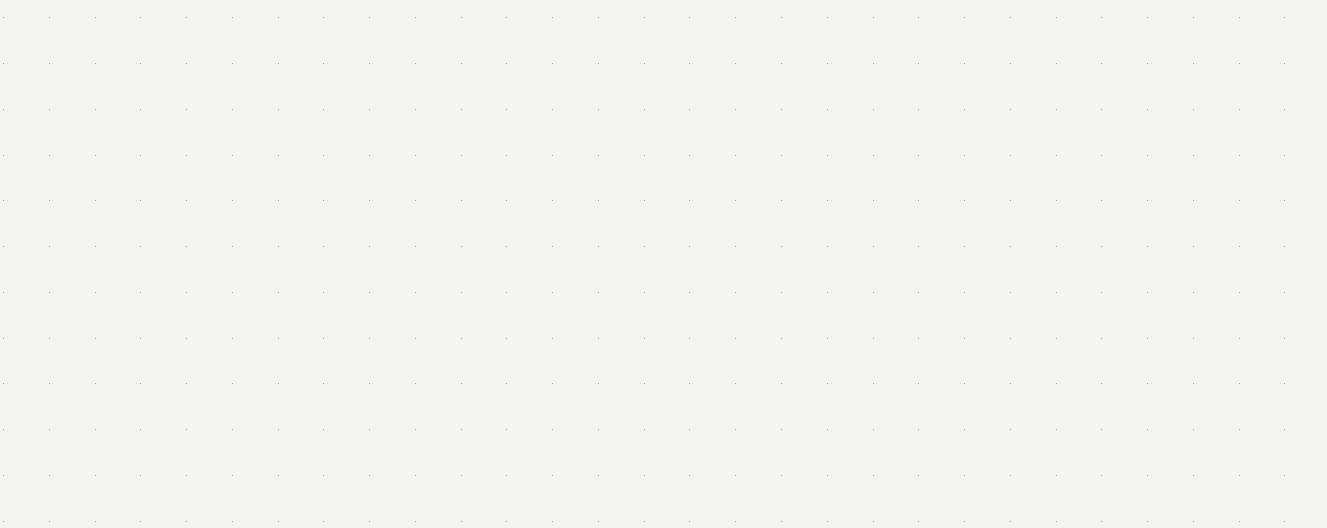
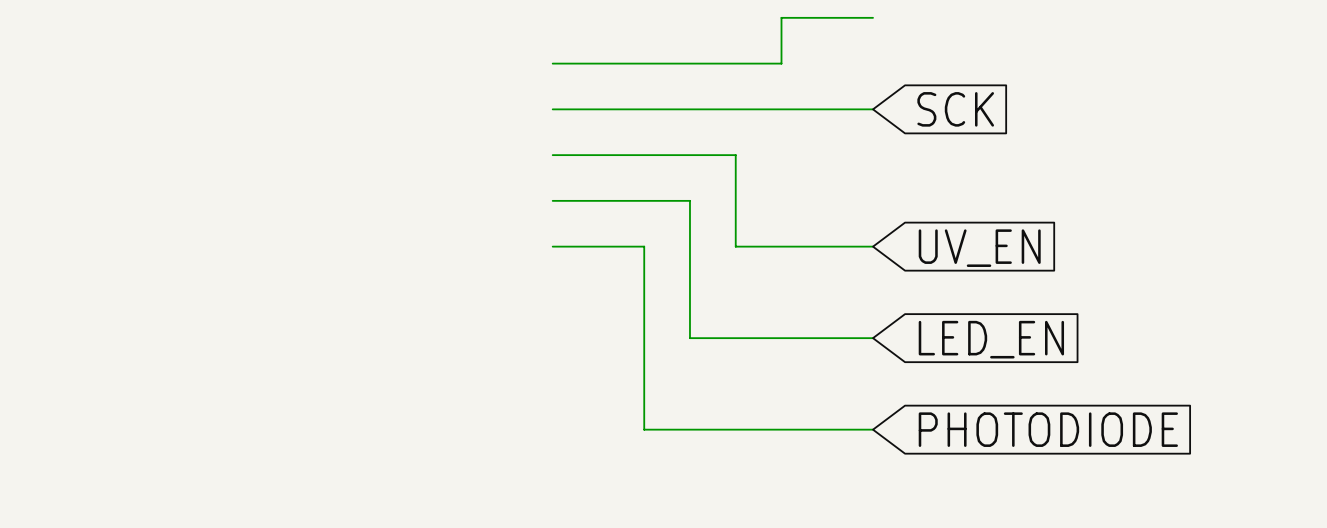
wire: none -> (873, 17) (781, 17) (781, 63) (552, 63)
wire: none -> (552, 109) (873, 109)
global label: none -> SCK (955, 109)
wire: none -> (552, 155) (735, 155) (735, 246) (873, 246)
wire: none -> (552, 200) (689, 200) (689, 338) (873, 338)
wire: none -> (552, 246) (644, 246) (644, 429) (873, 429)
global label: none -> UV_EN (979, 248)
global label: none -> LED_EN (991, 339)
global label: none -> PHOTODIODE (1048, 429)

